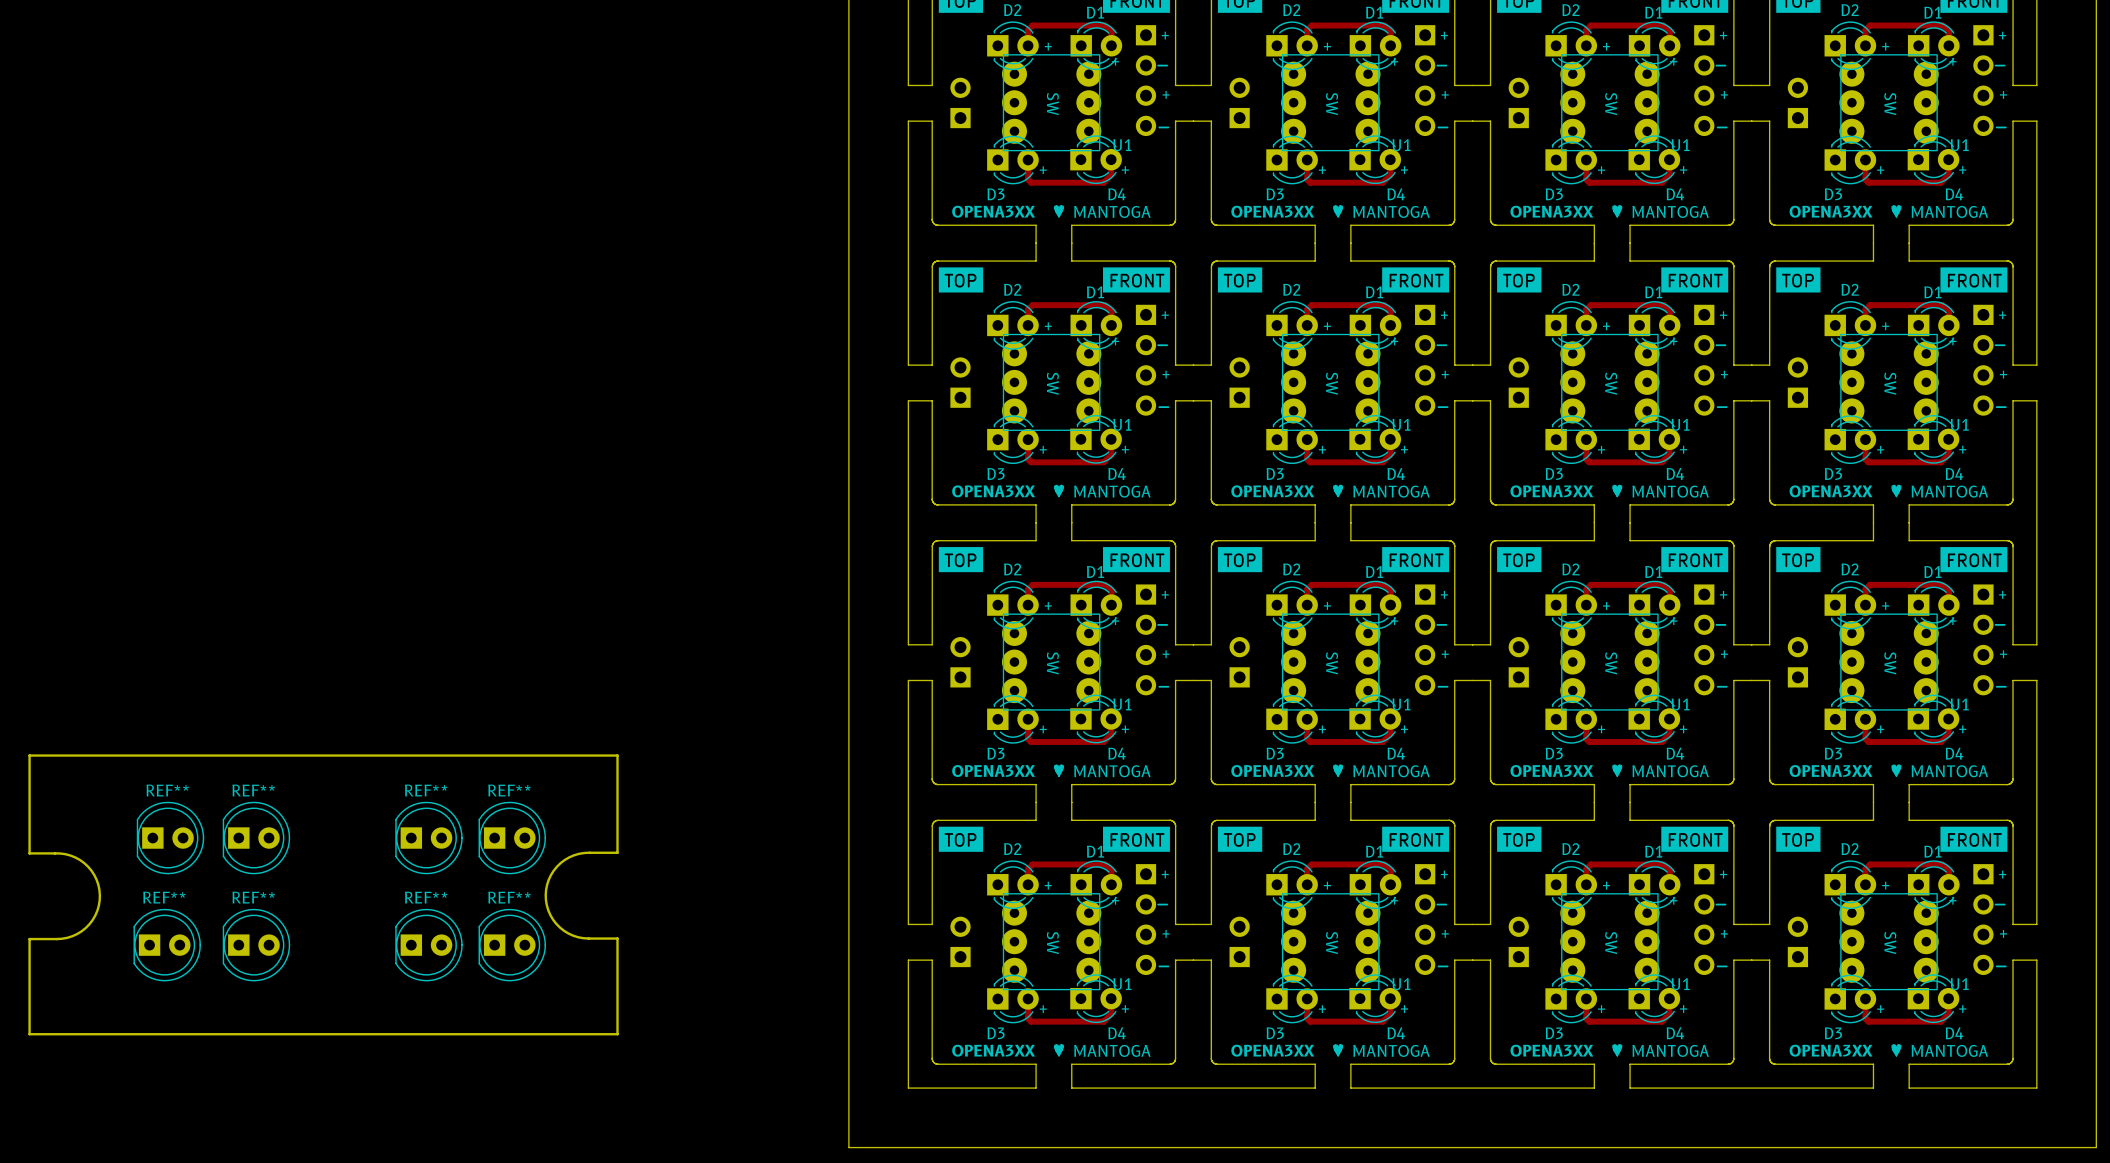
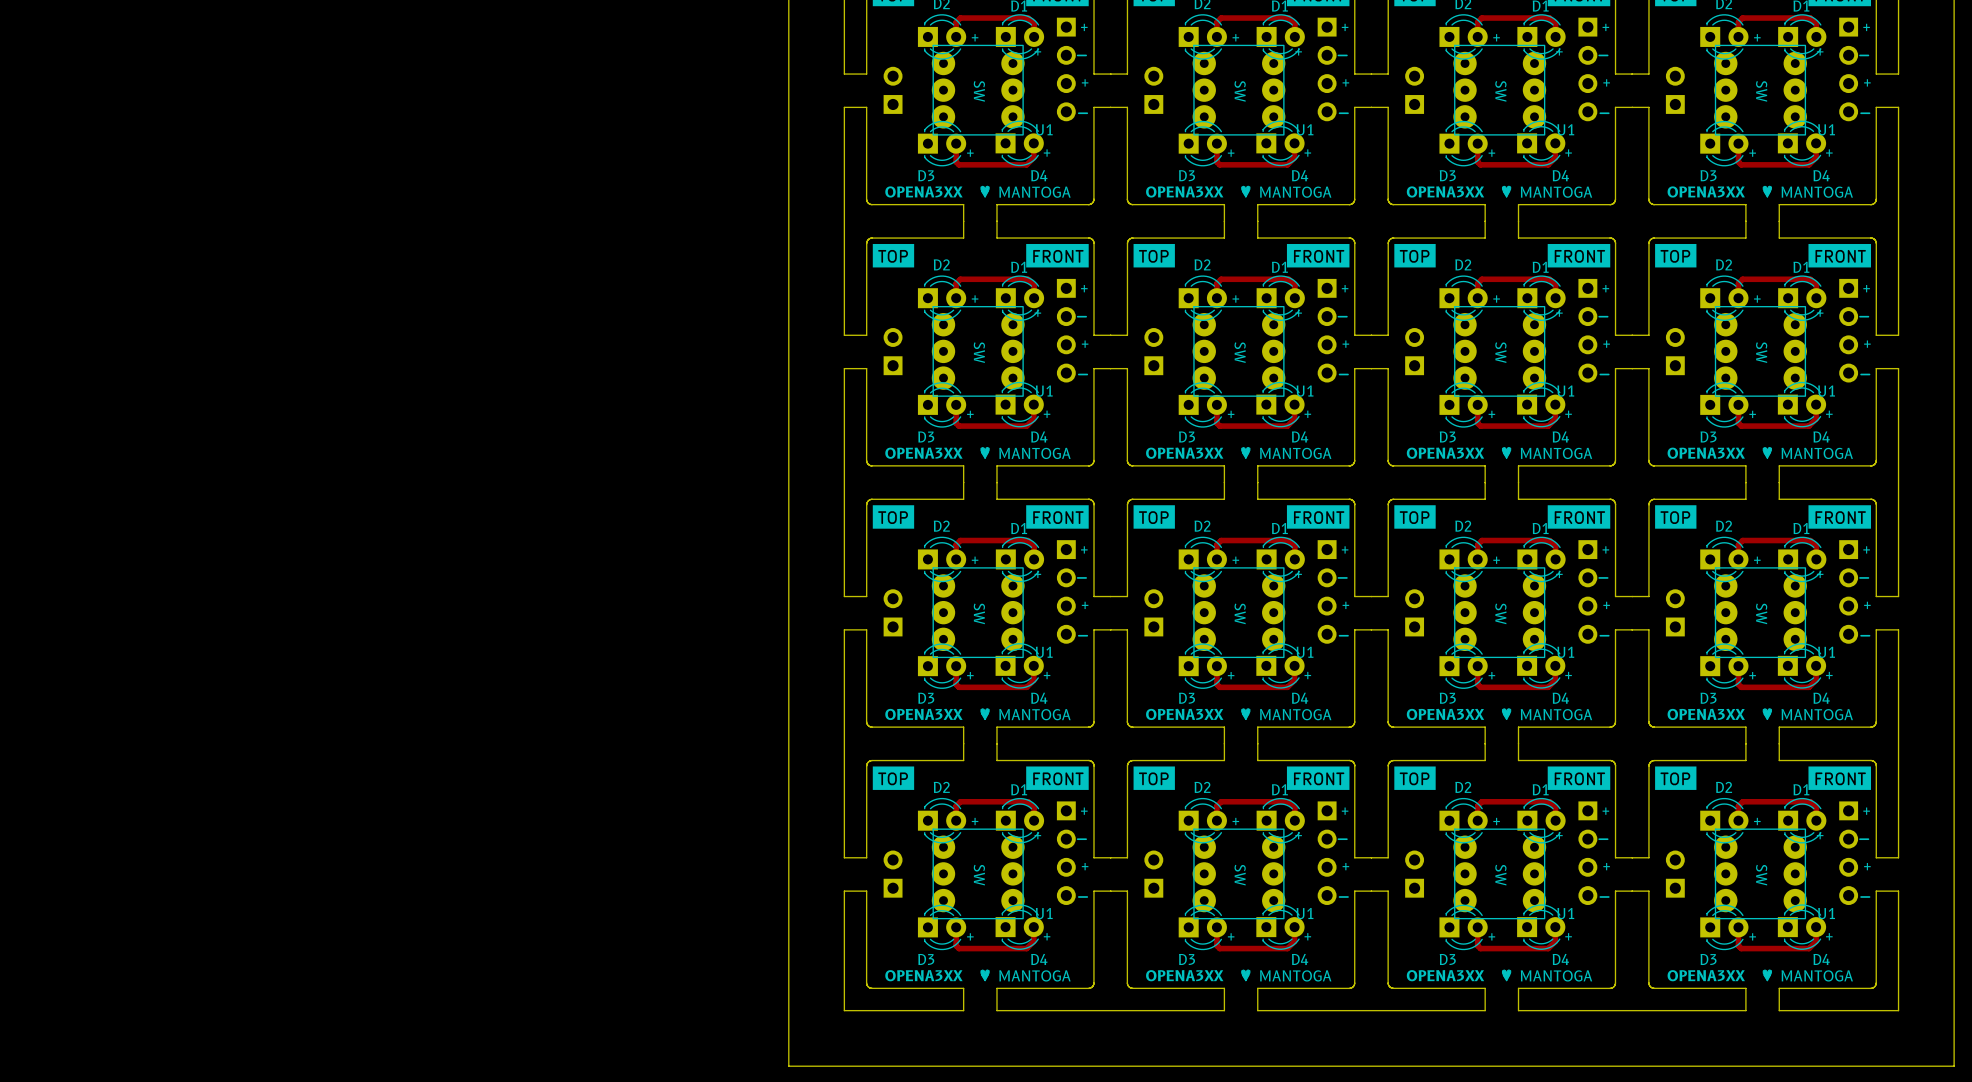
board edge: (29, 755) (617, 755) (617, 852) (584, 852) (564, 859) (550, 875) (545, 895) (550, 915) (559, 927) (568, 933) (583, 938) (617, 938) (617, 1034) (29, 1034) (29, 939) (62, 938) (81, 931) (95, 915) (99, 895) (94, 875) (80, 860) (60, 853) (29, 853) (29, 755) -> none
REF**: (170, 838) -> none
REF**: (256, 838) -> none
REF**: (428, 838) -> none
REF**: (512, 838) -> none
REF**: (167, 945) -> none
REF**: (256, 945) -> none
REF**: (428, 945) -> none
REF**: (512, 945) -> none

